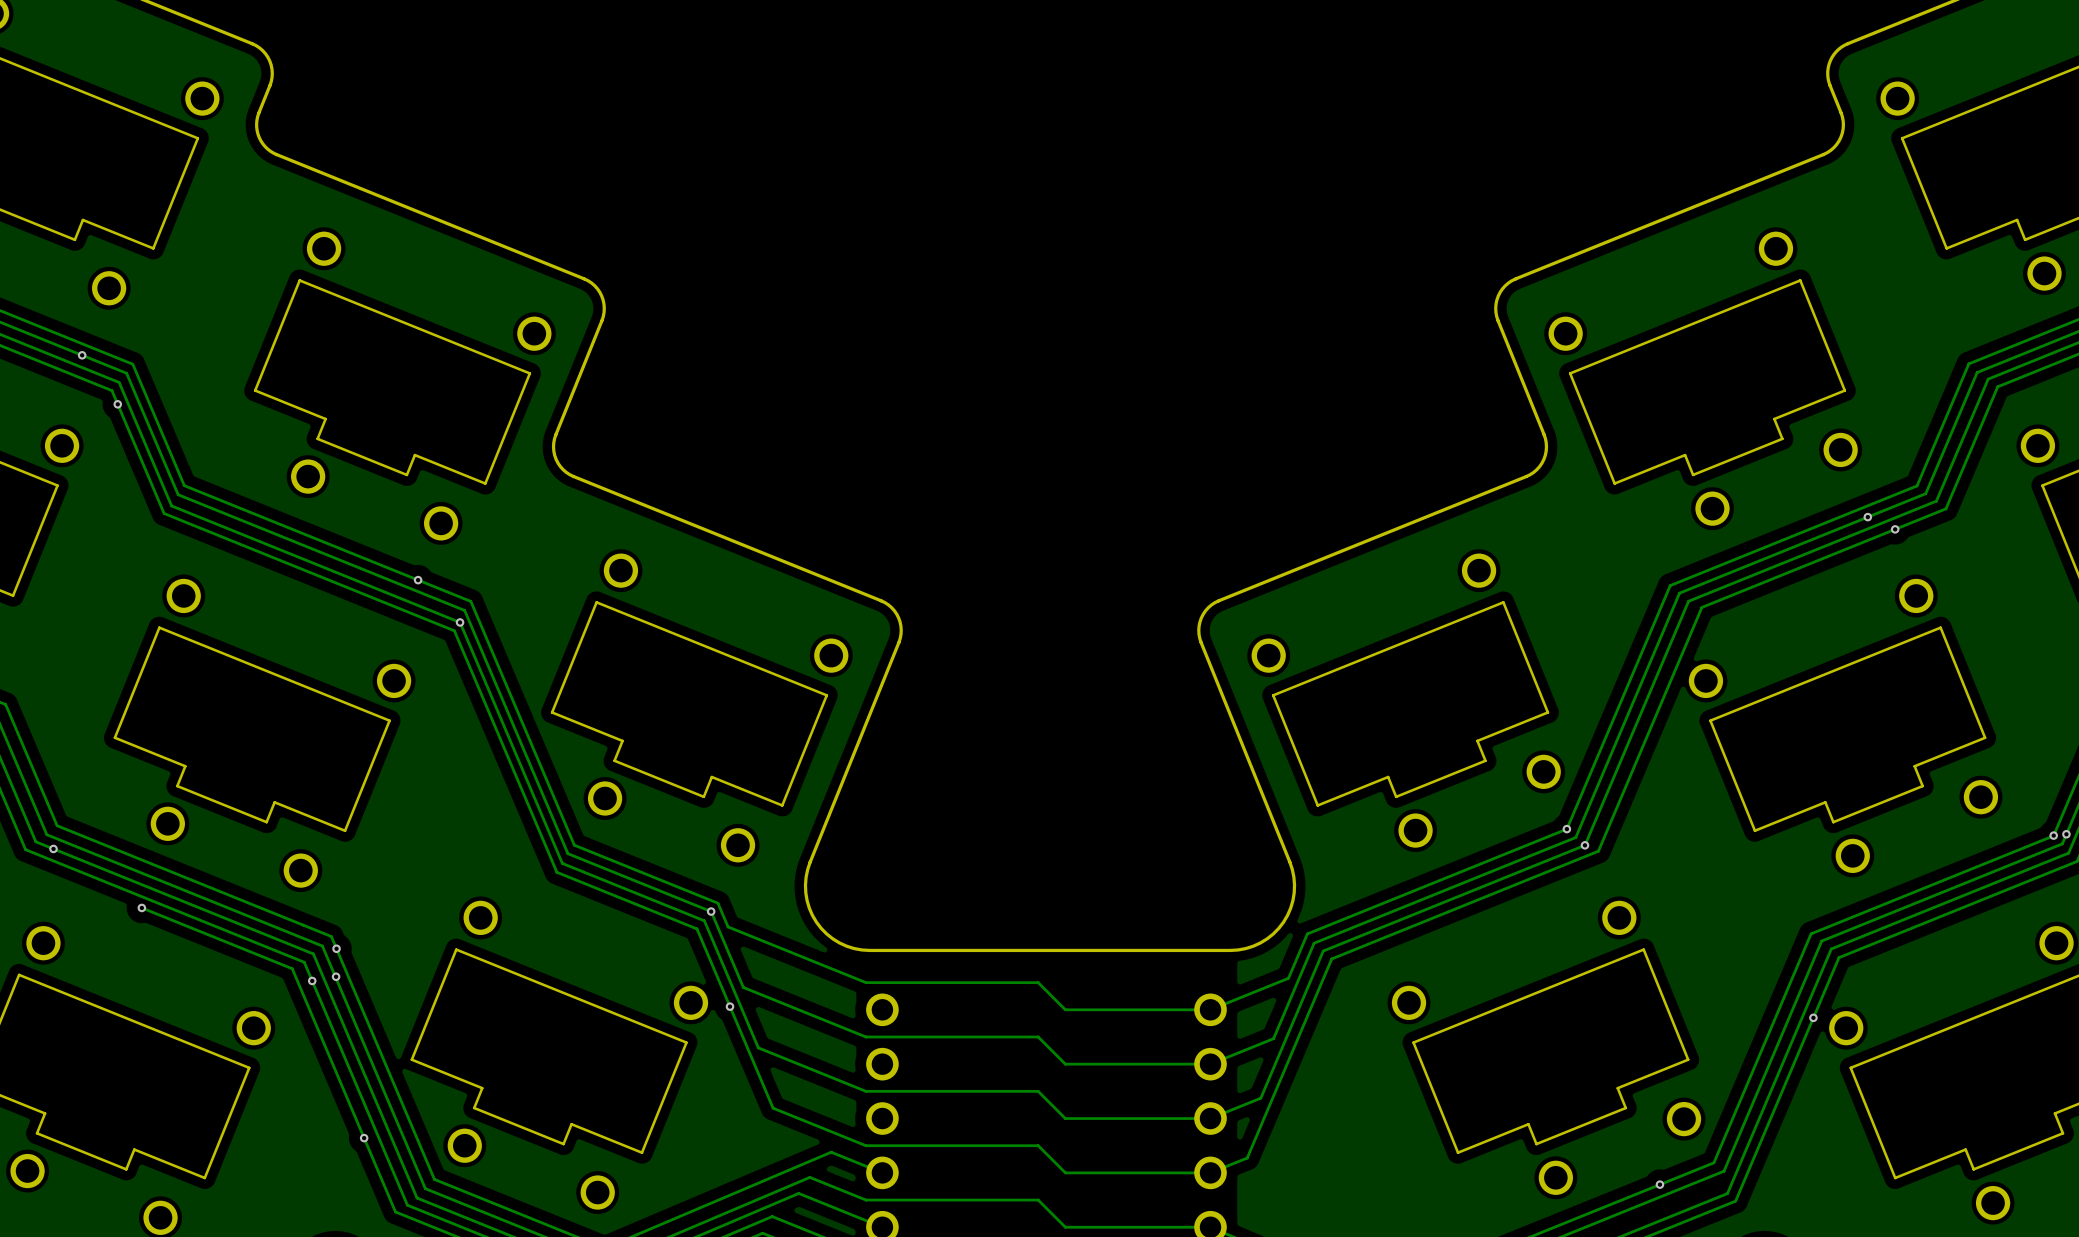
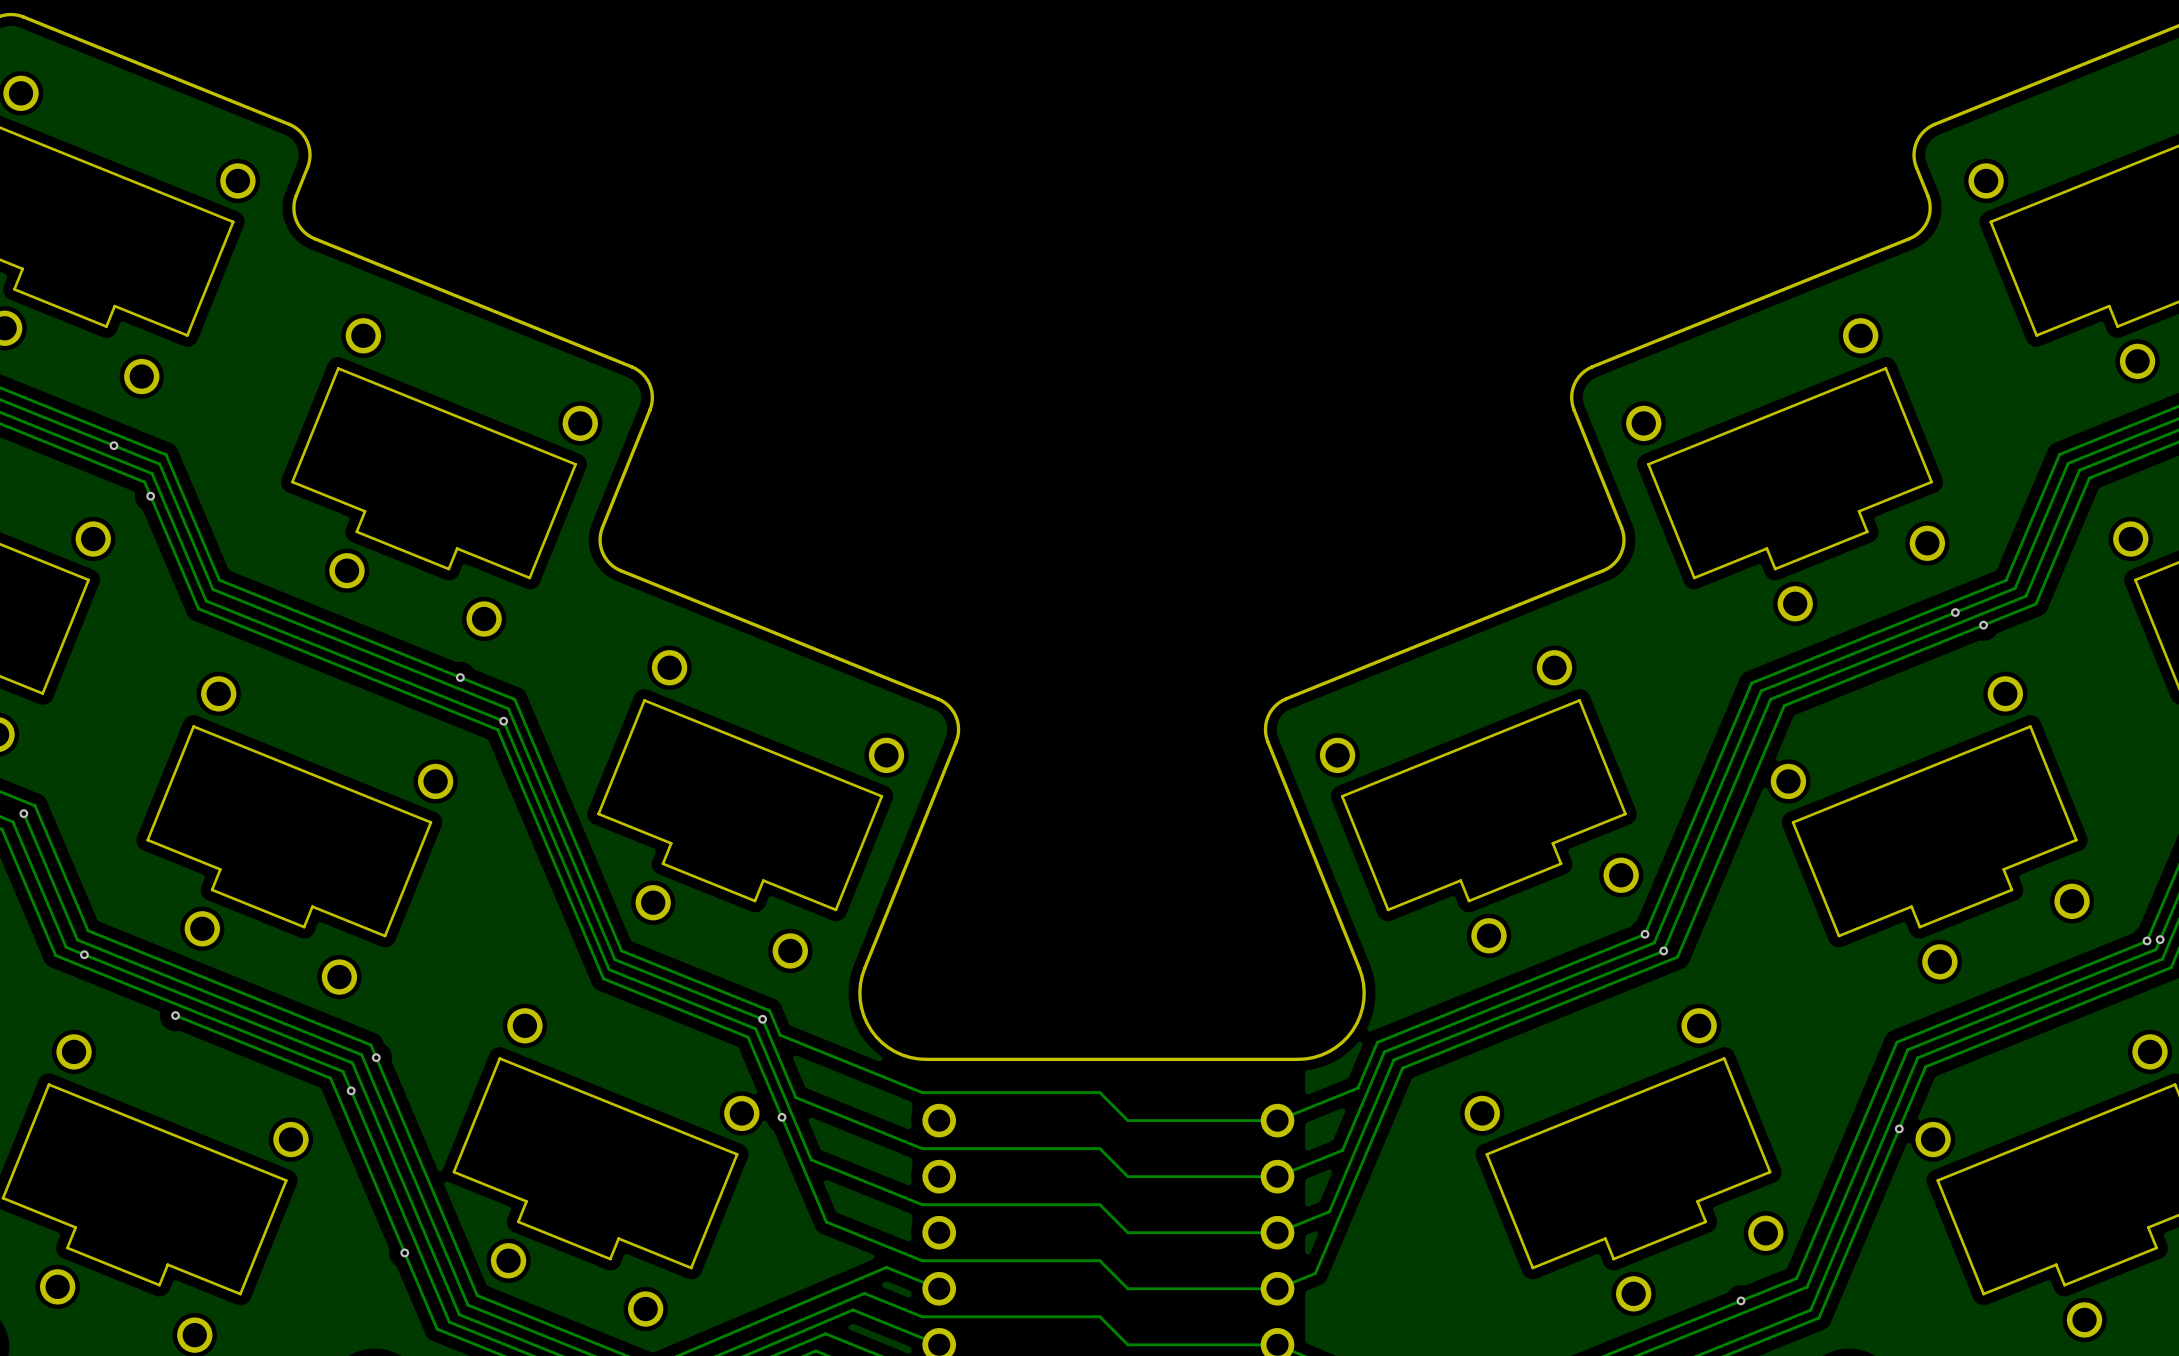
via: (336, 976) -> none

